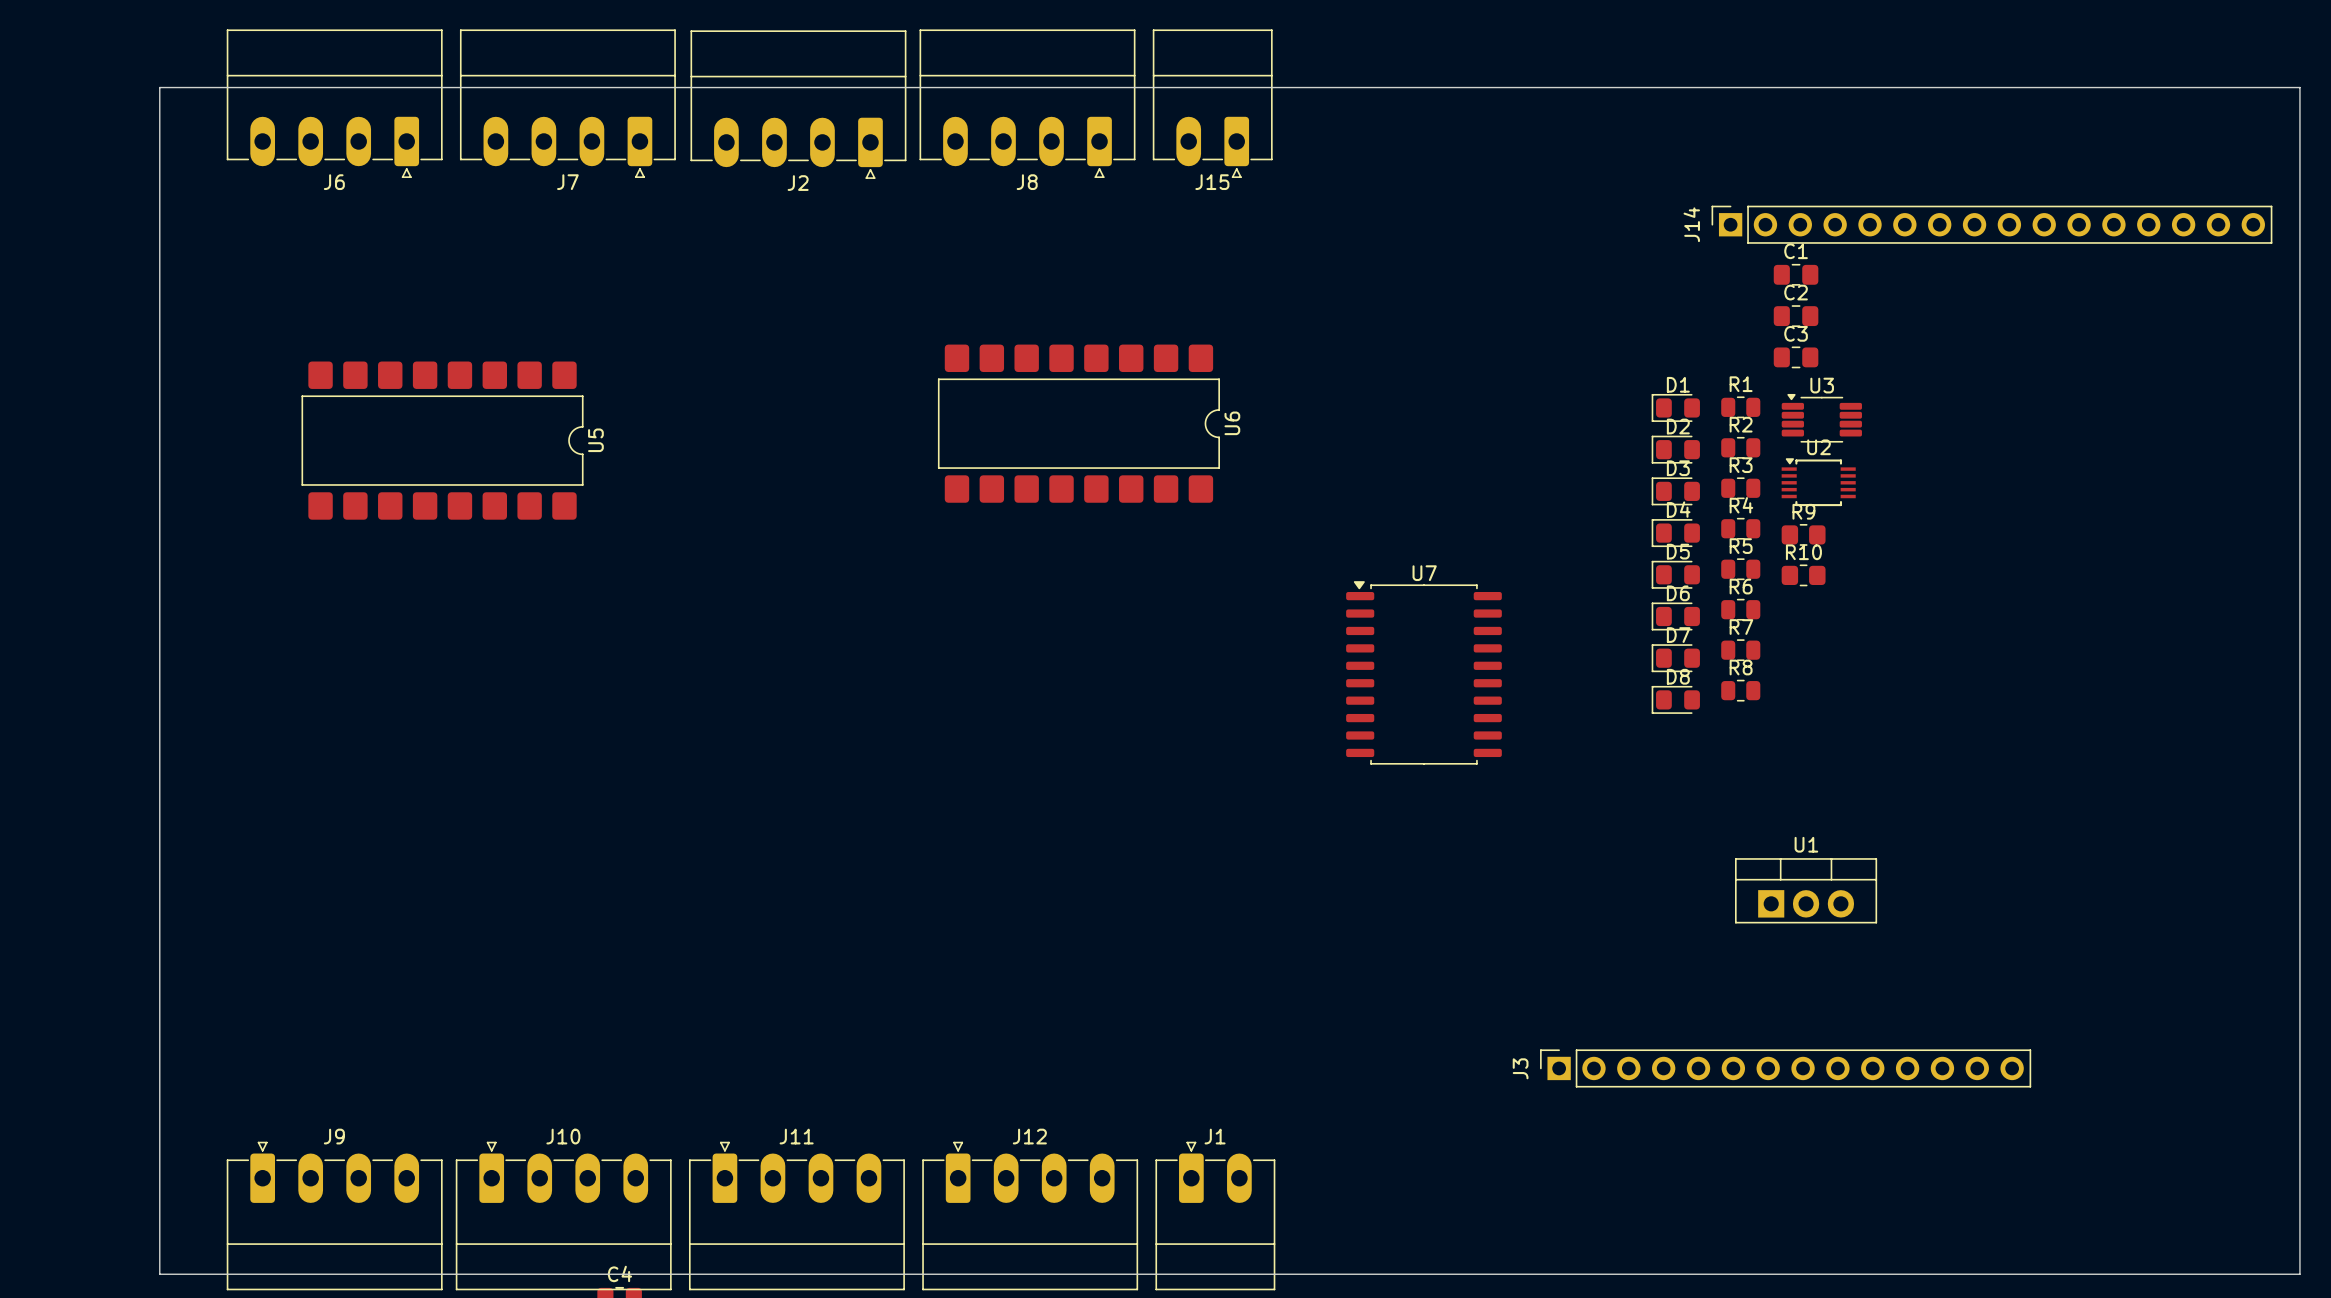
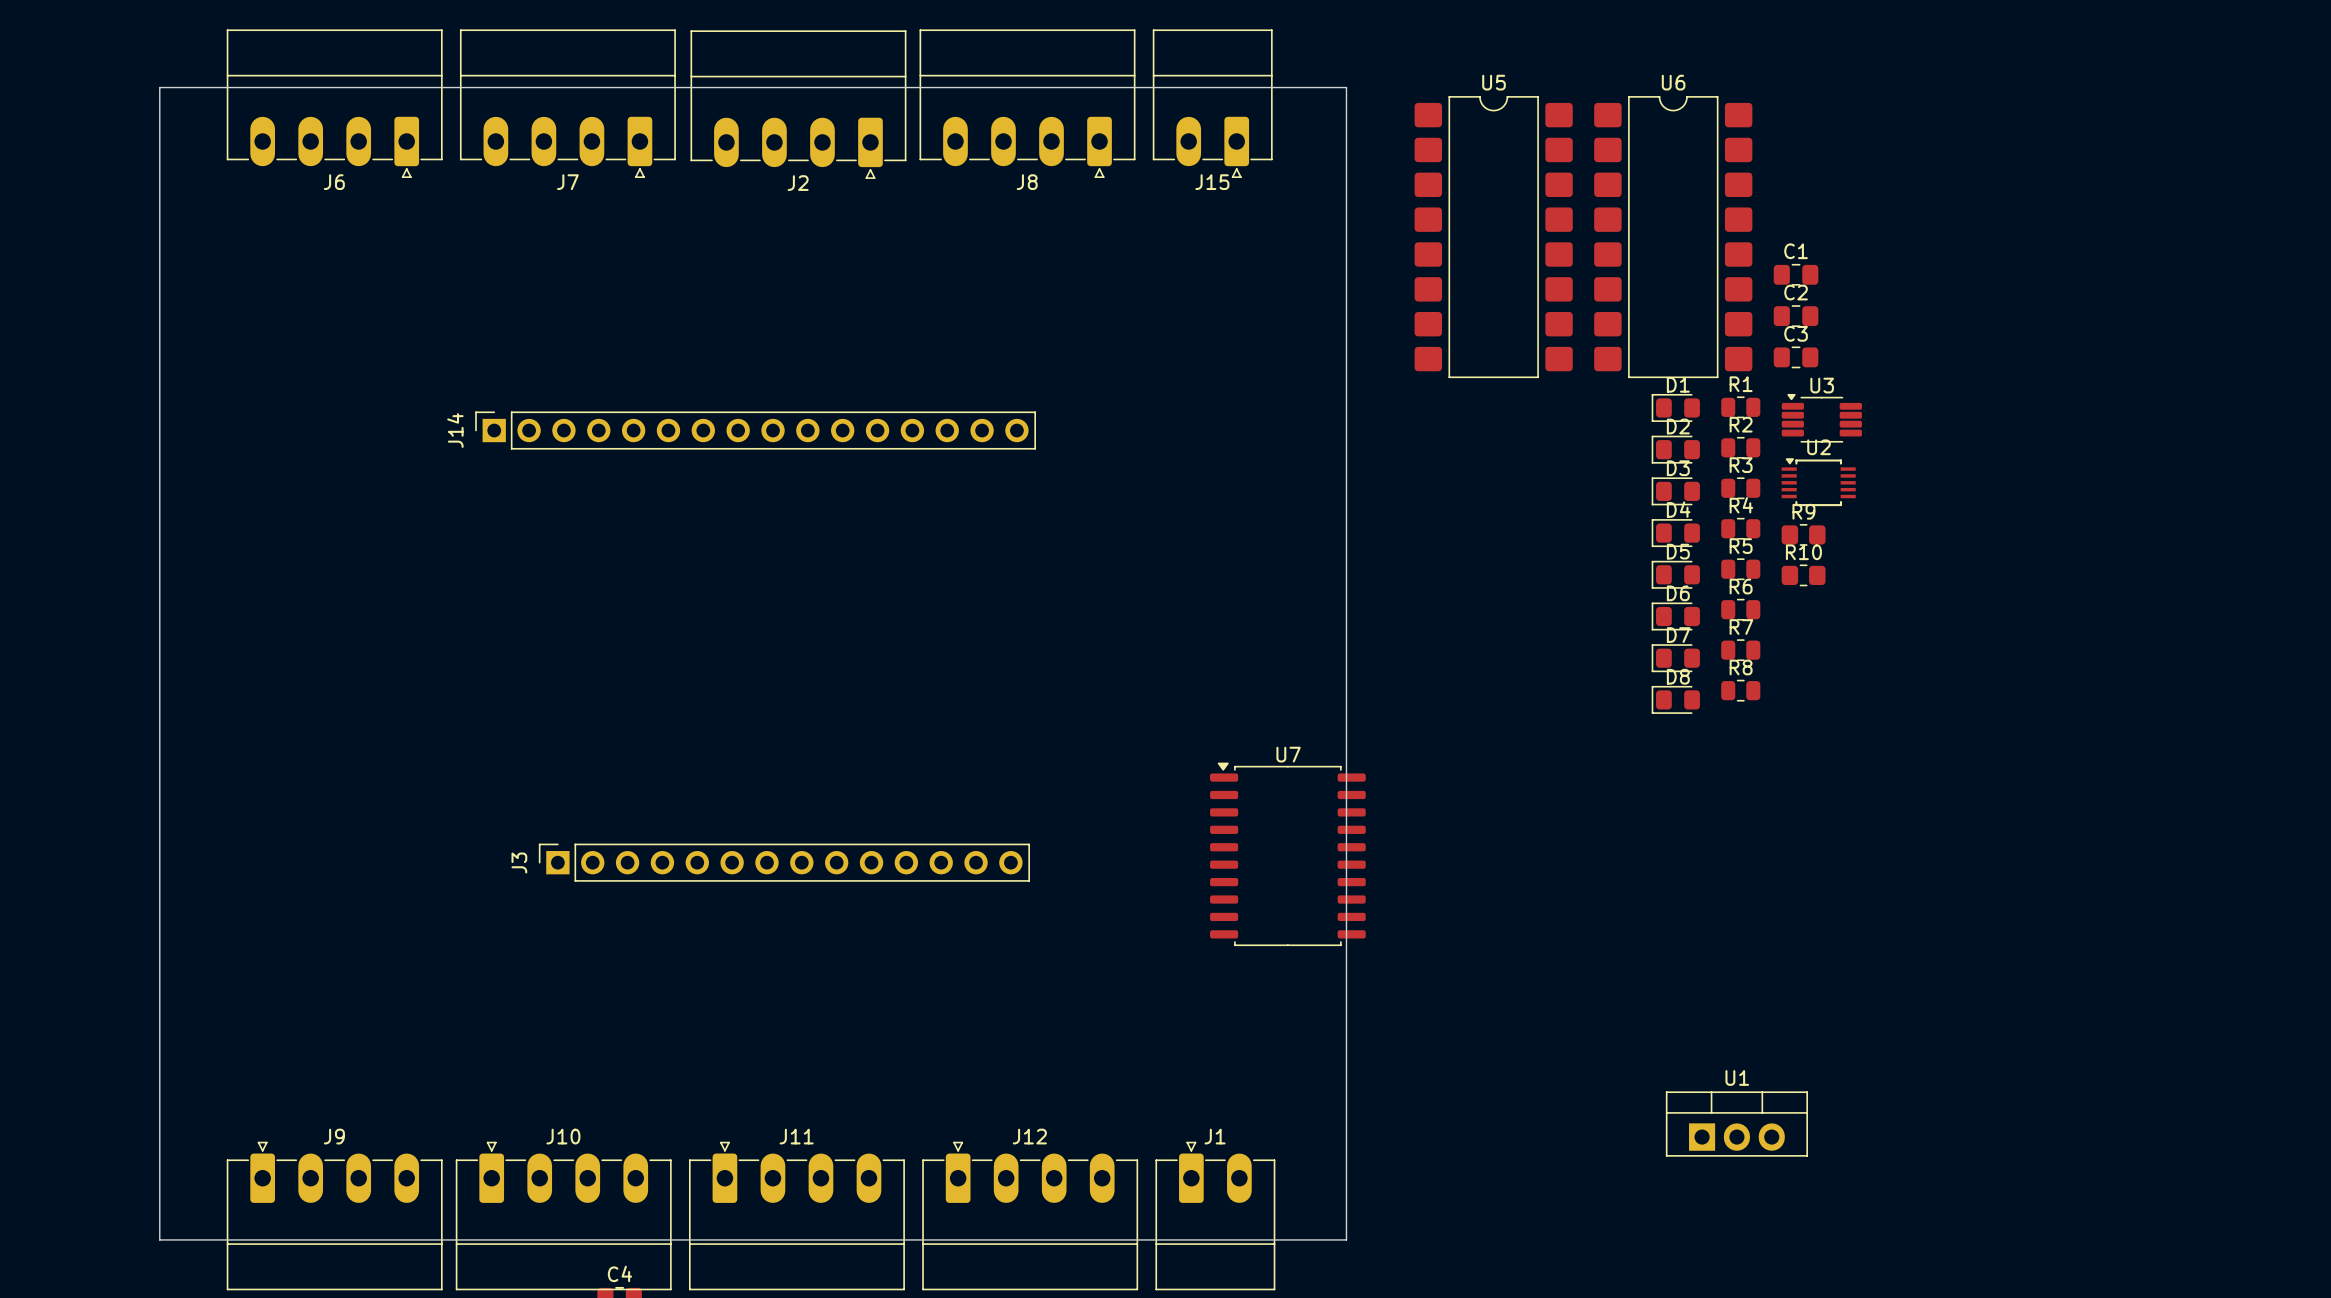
board edge: (1346, 87) (2299, 87) (2299, 1274) (159, 1274) (159, 1239) -> (1346, 87) (1346, 1239) (159, 1239)
J14 position: (1991, 224) -> (755, 430)
U6 rotation: 0° (1078, 423) -> 90° counterclockwise (1673, 237)
U6 position: (1078, 423) -> (1673, 237)
U5 rotation: 0° (442, 440) -> 90° counterclockwise (1493, 237)
U5 position: (442, 440) -> (1493, 237)
U7 position: (1423, 672) -> (1287, 854)
U1 position: (1806, 890) -> (1736, 1124)
J3 position: (1785, 1068) -> (784, 862)

